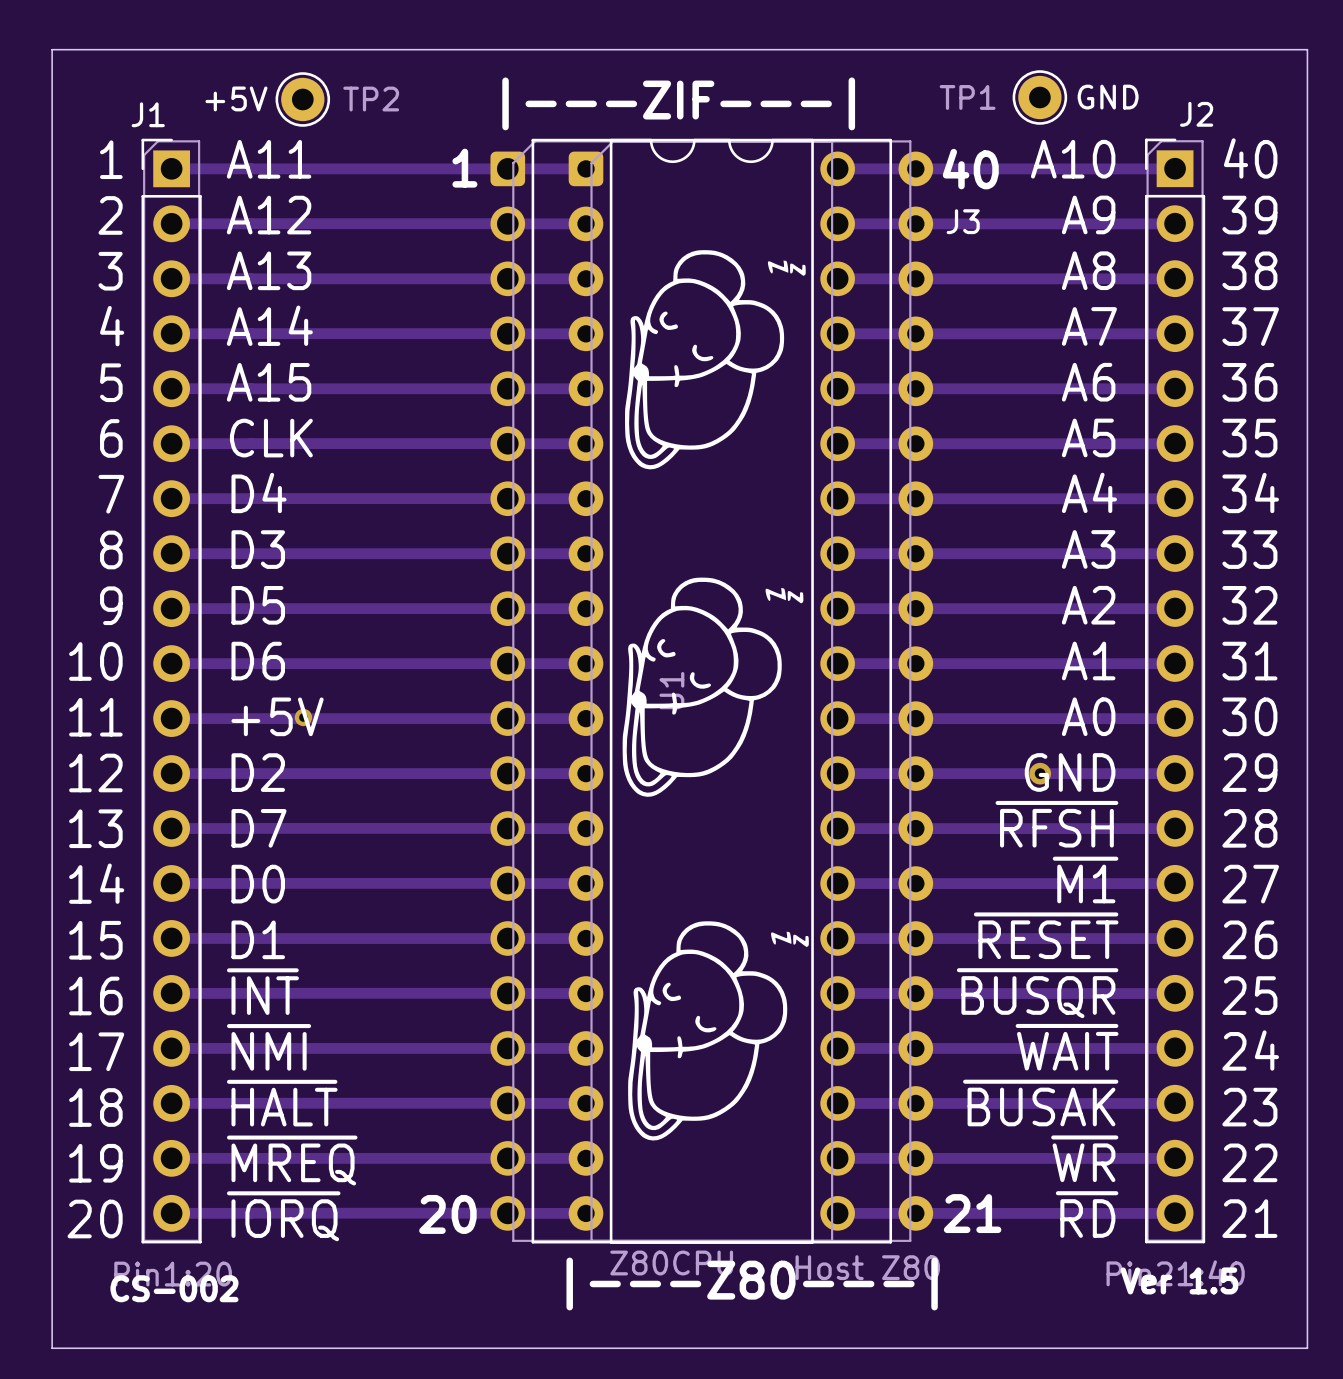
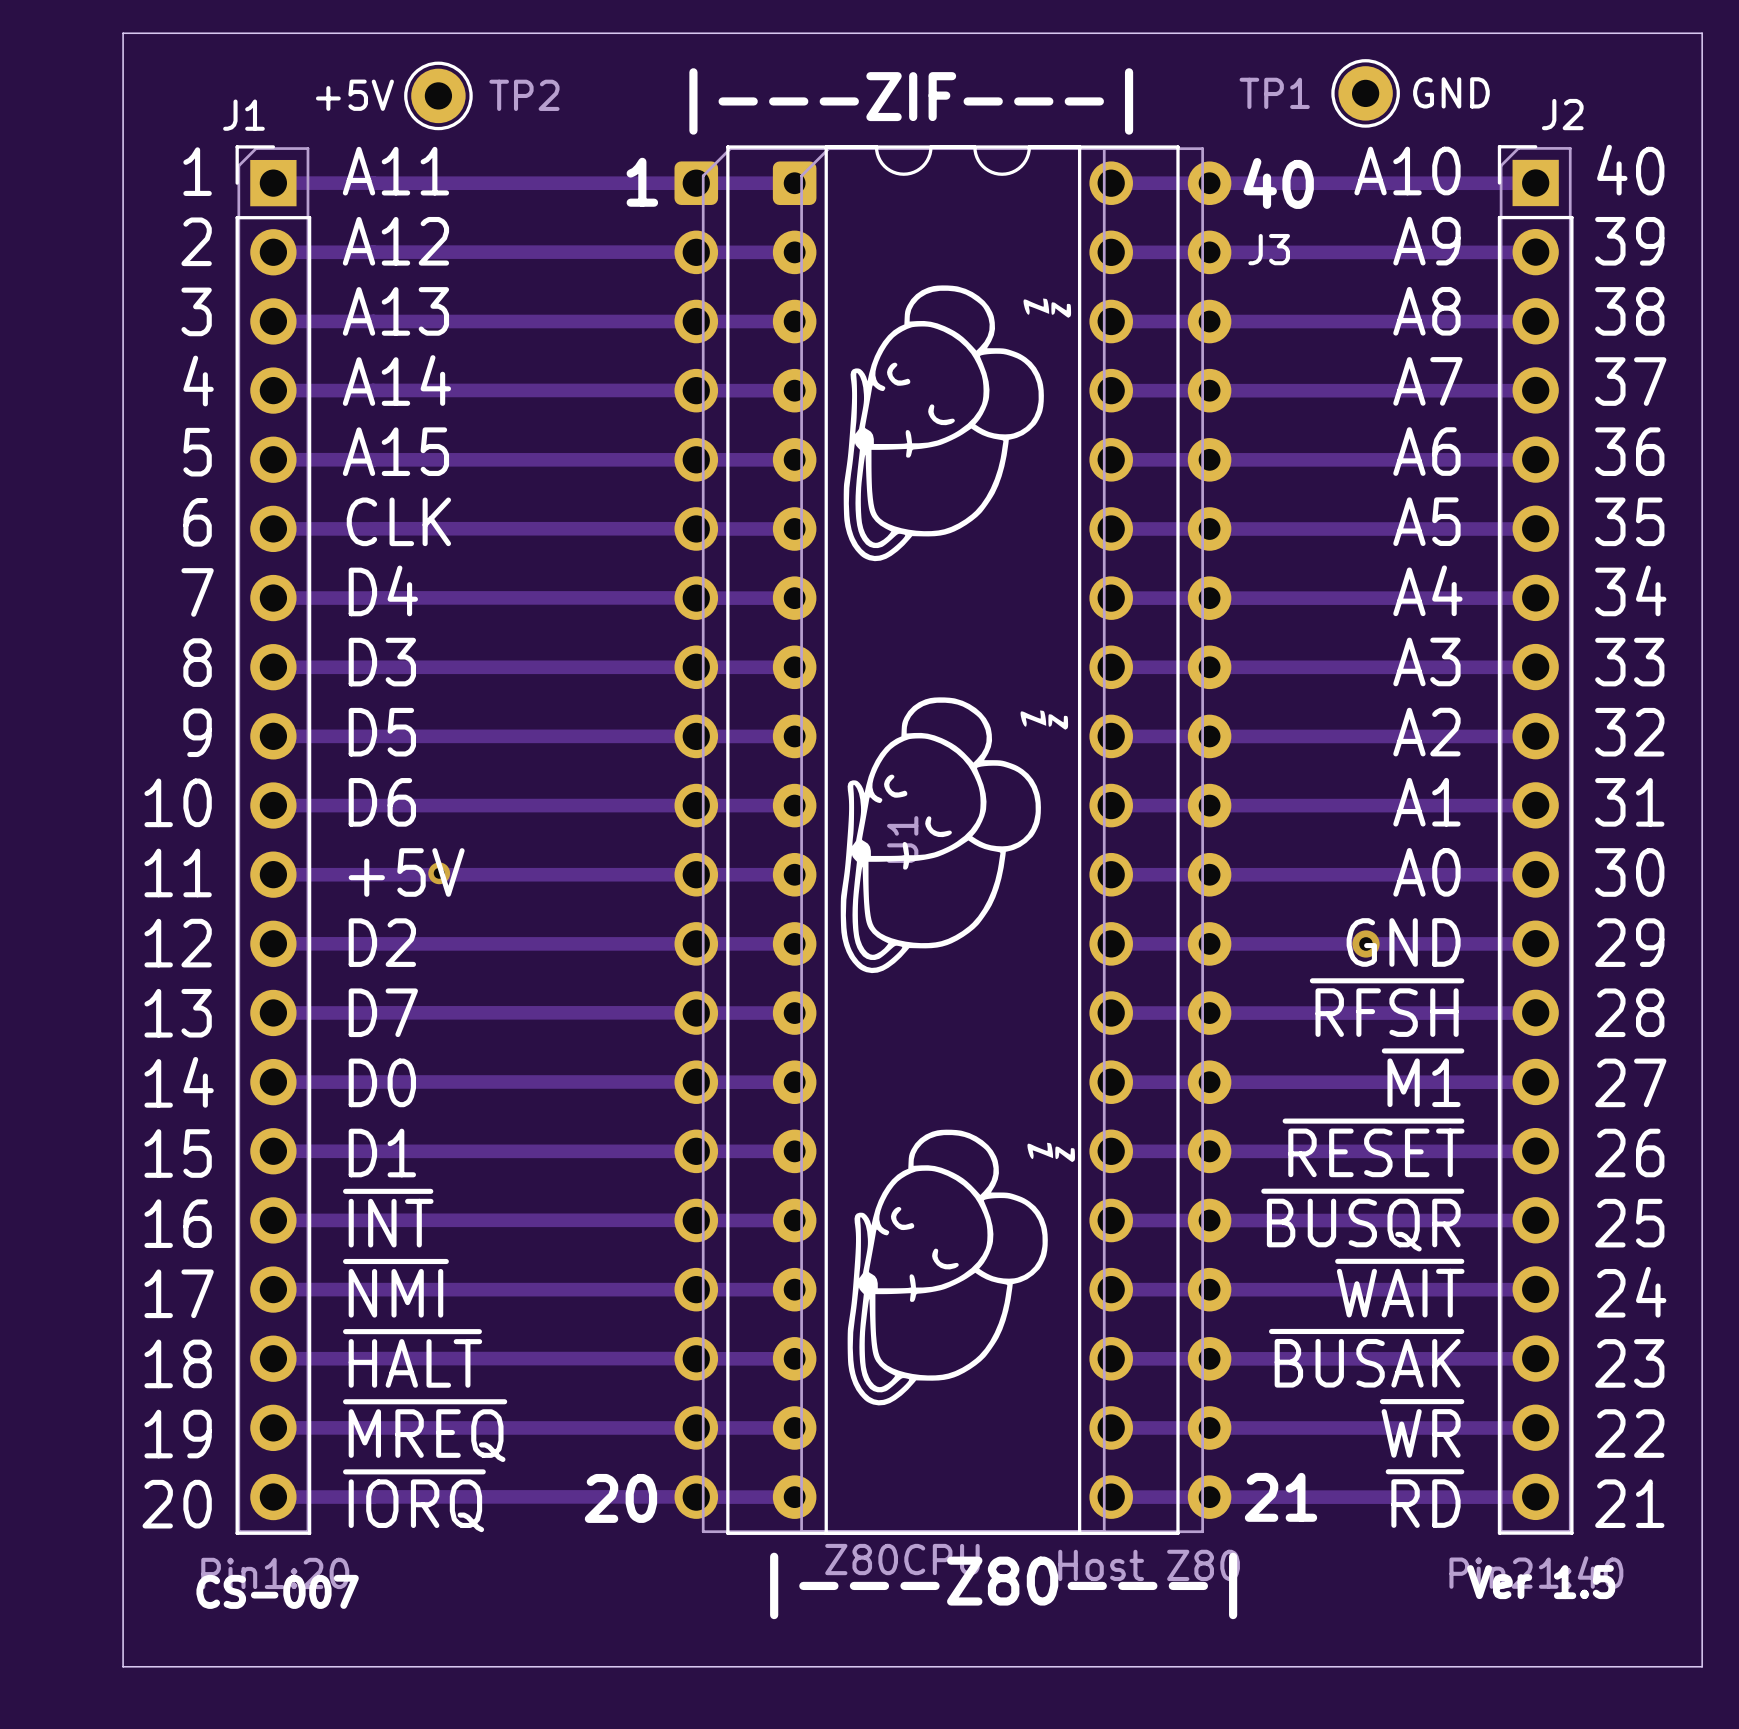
text: CS-002 (174, 1288) -> CS-007 (277, 1591)

